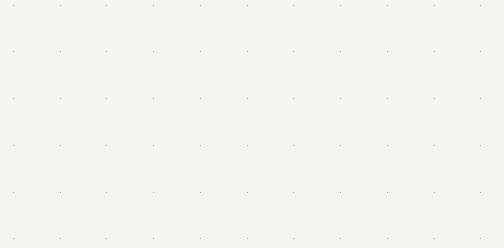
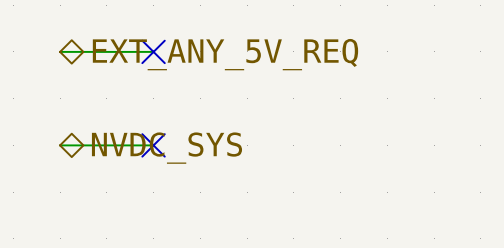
wire: none -> (60, 51) (153, 51)
no-connect mark: none -> (153, 51)
hierarchical label: none -> EXT_ANY_5V_REQ (225, 54)
wire: none -> (60, 145) (153, 145)
no-connect mark: none -> (153, 145)
hierarchical label: none -> NVDC_SYS (166, 148)

